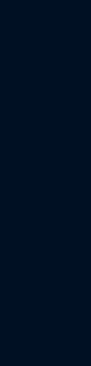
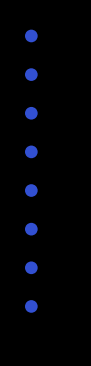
part: none -> (31, 35)
part: none -> (31, 74)
part: none -> (31, 113)
part: none -> (31, 151)
part: none -> (31, 190)
part: none -> (31, 229)
part: none -> (31, 267)
part: none -> (31, 306)

